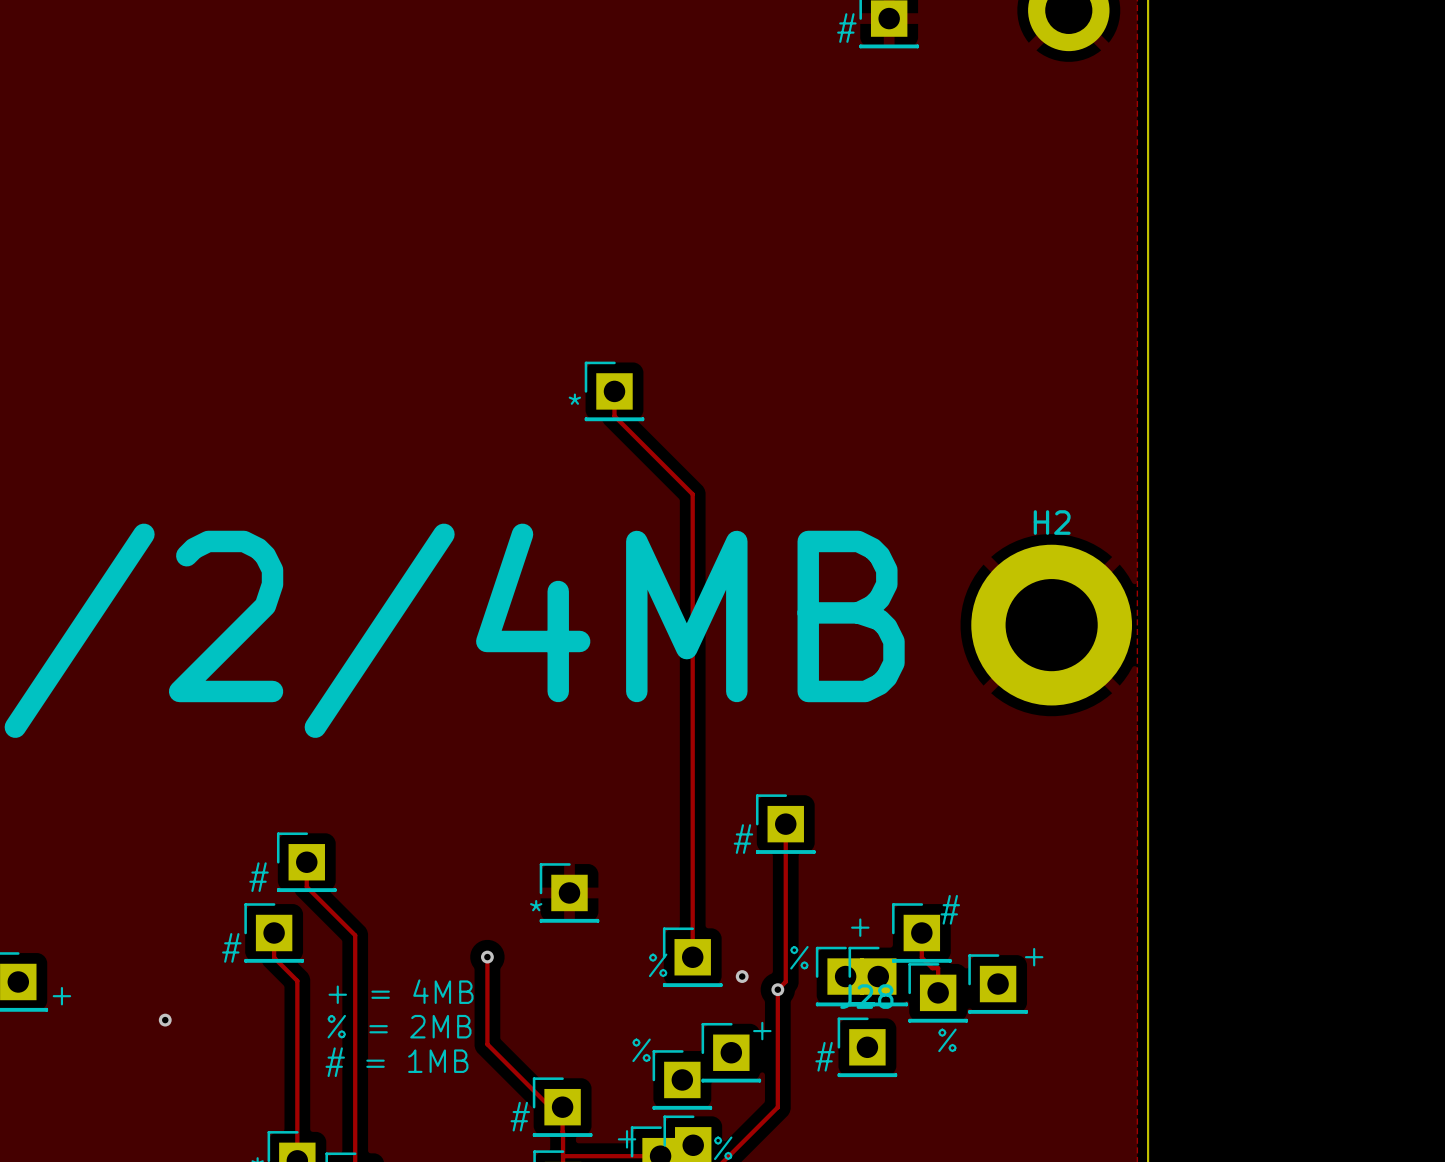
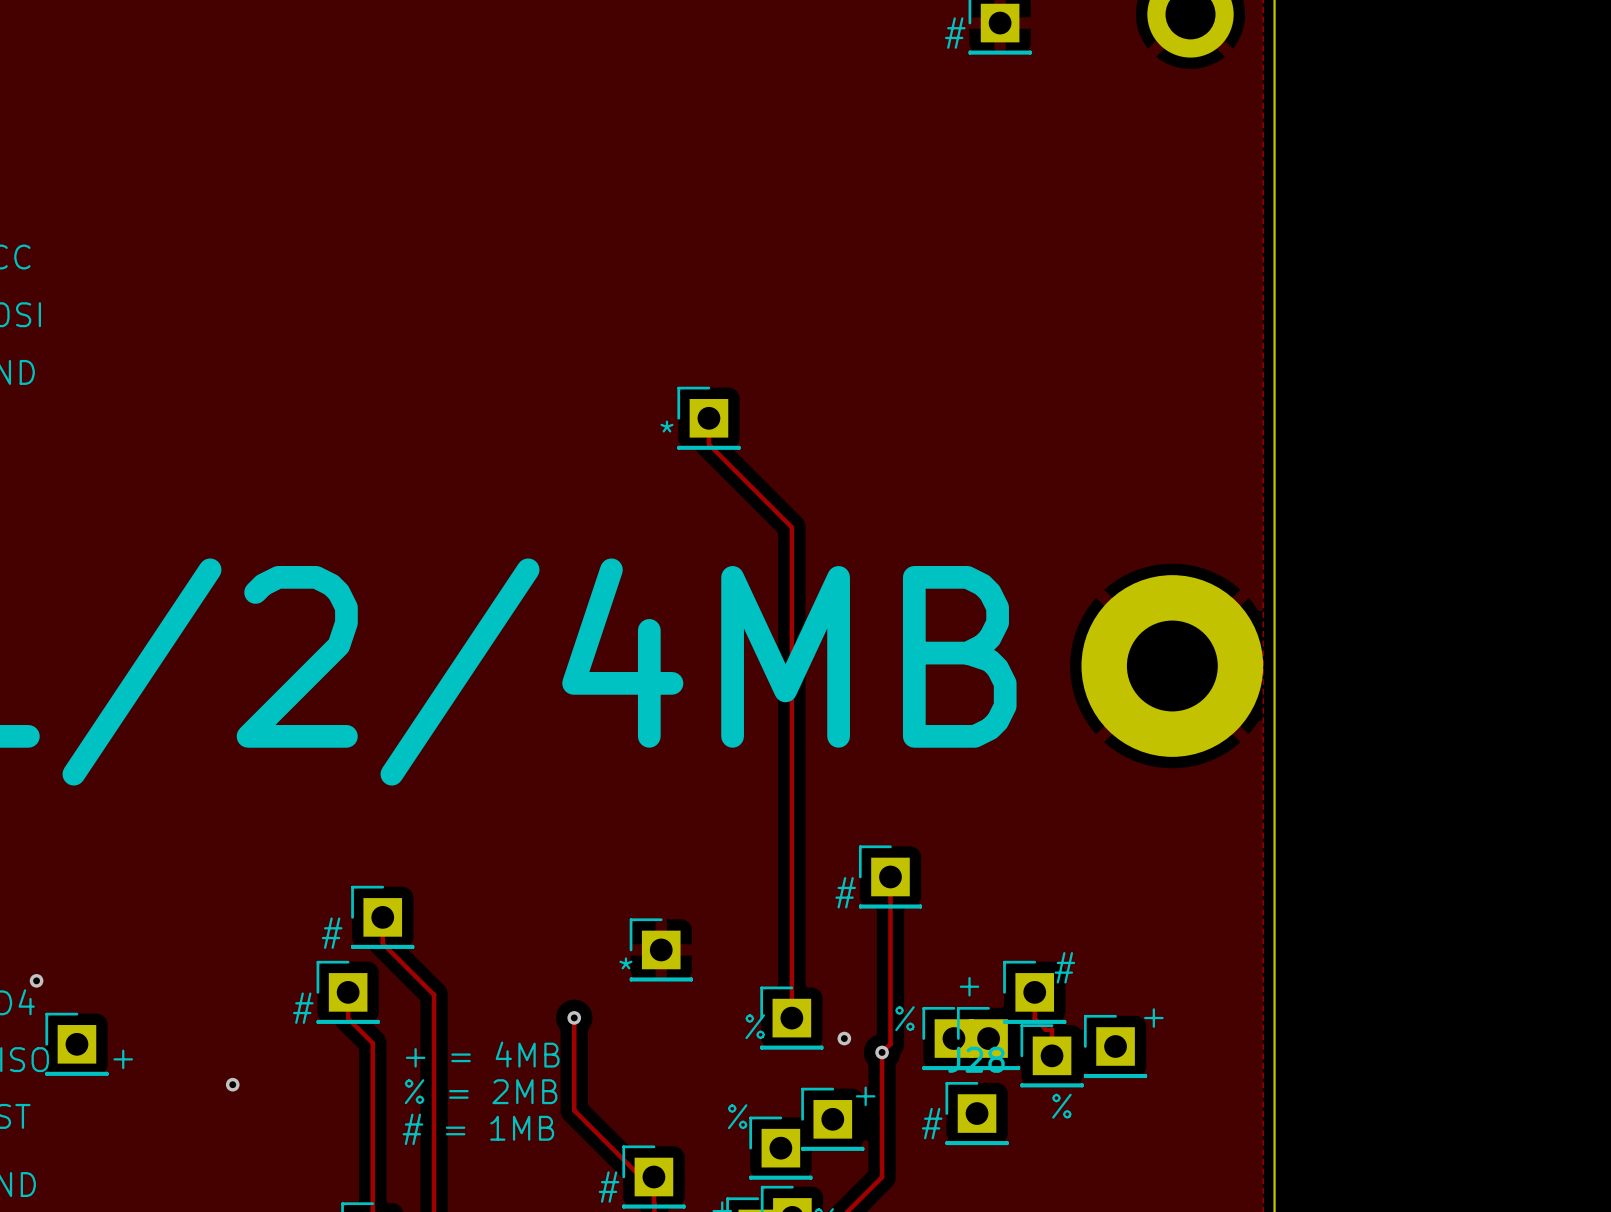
H2: (1051, 625) -> none
part: none -> (1172, 666)

